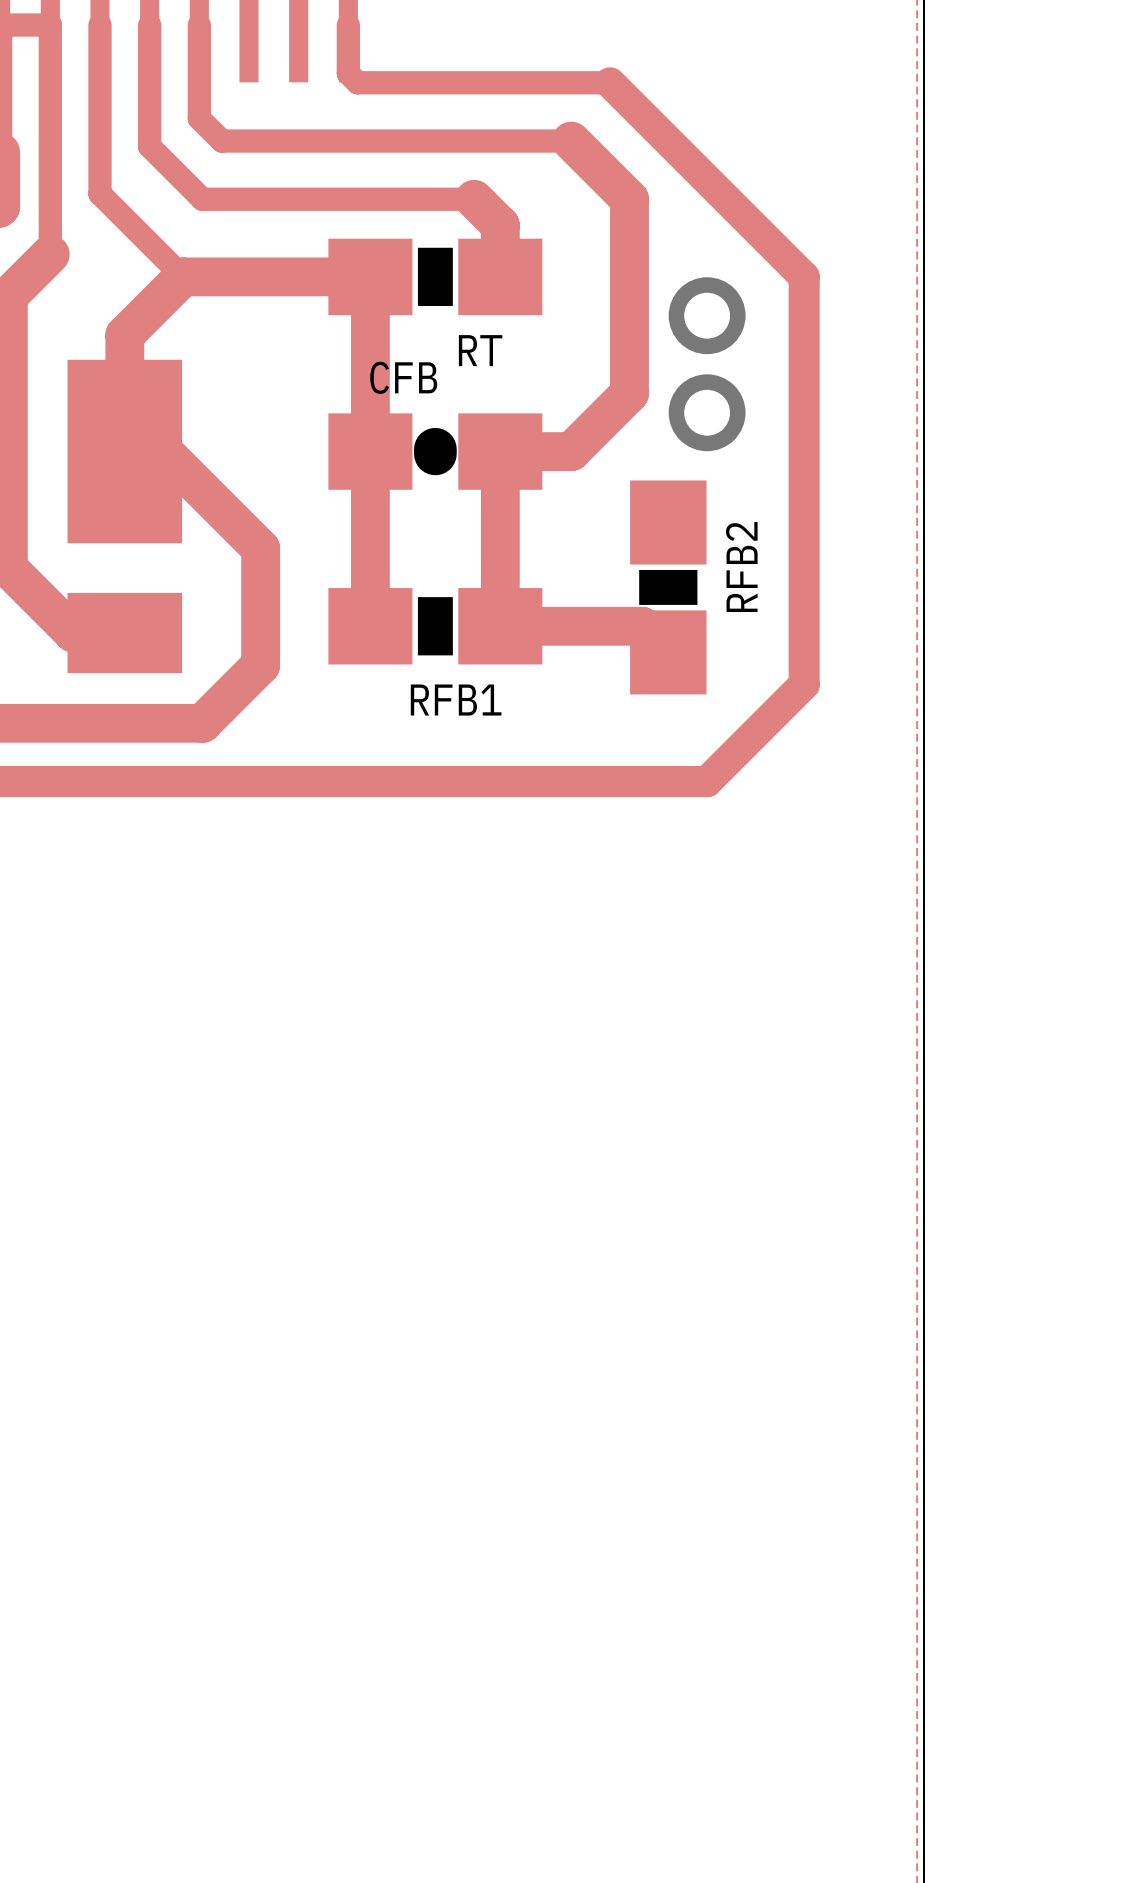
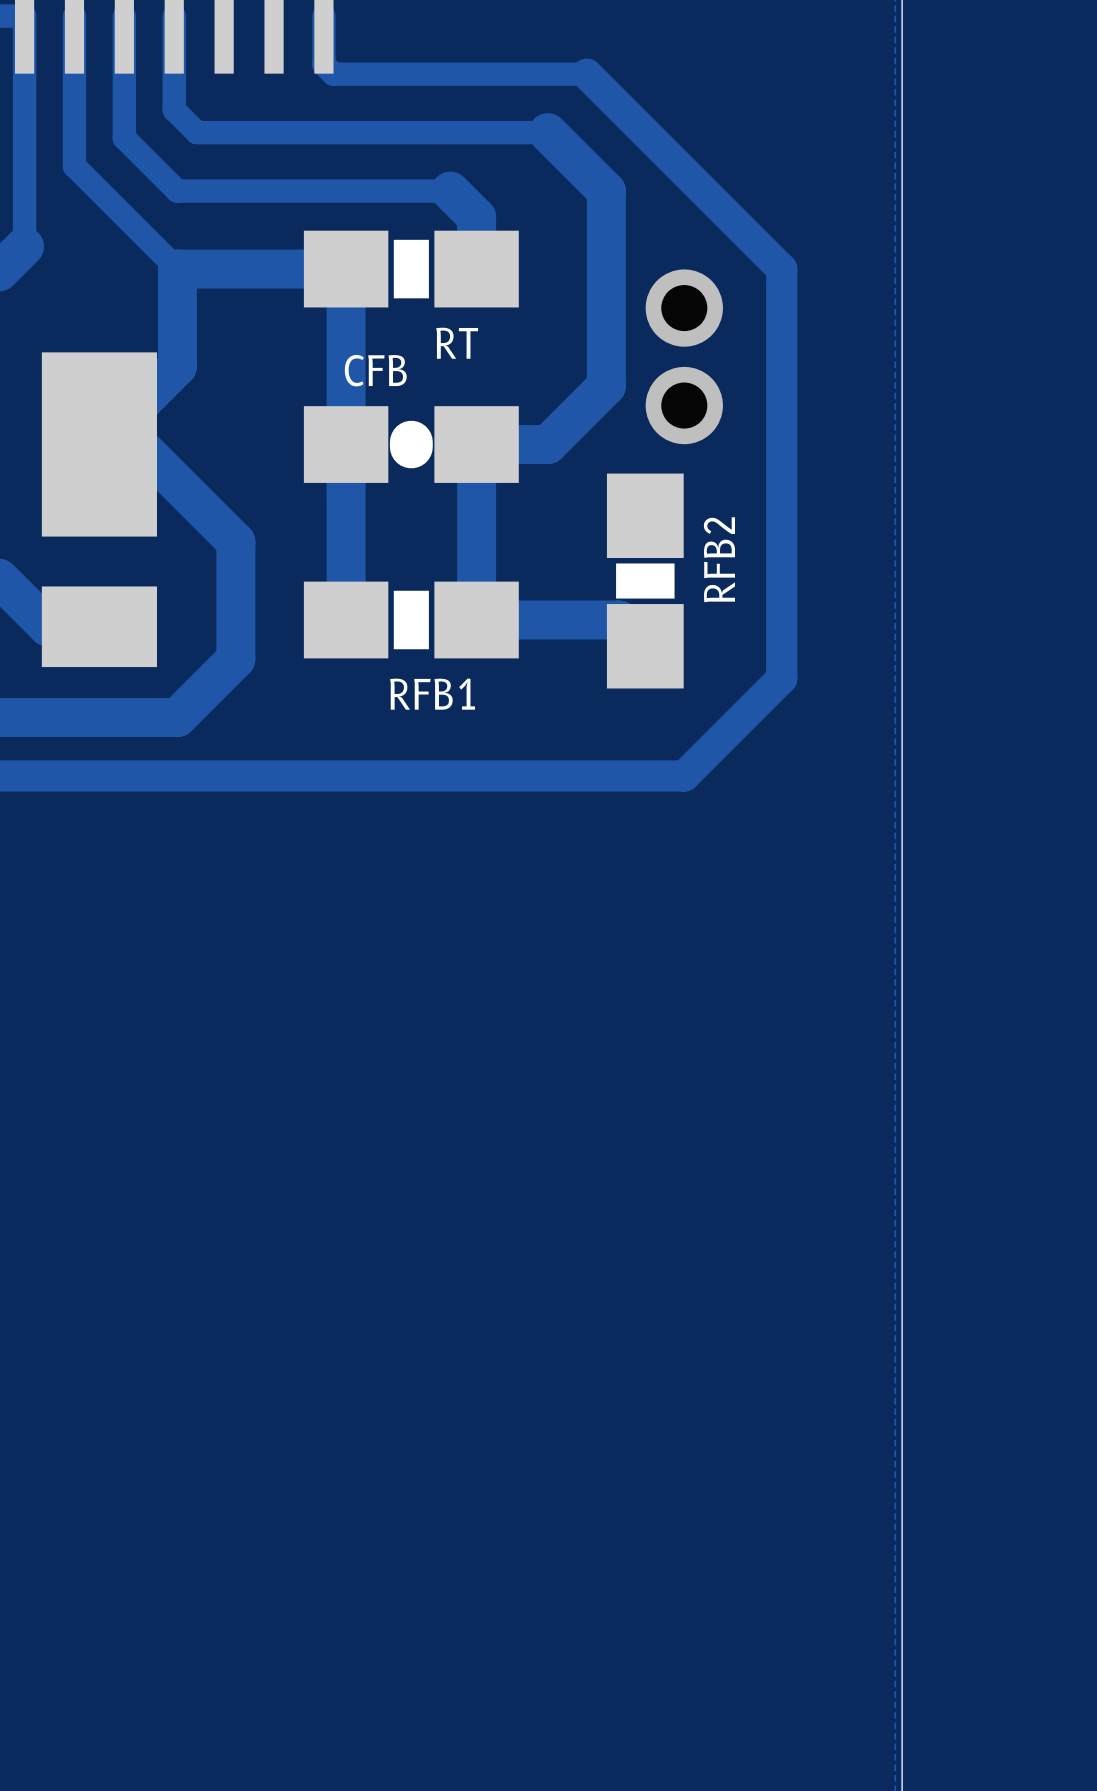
track: (99, 174) (99, 193) (183, 276) -> none
track: (183, 276) (124, 335) (124, 451) -> (74, 166) (177, 269) (177, 366) (99, 444)

